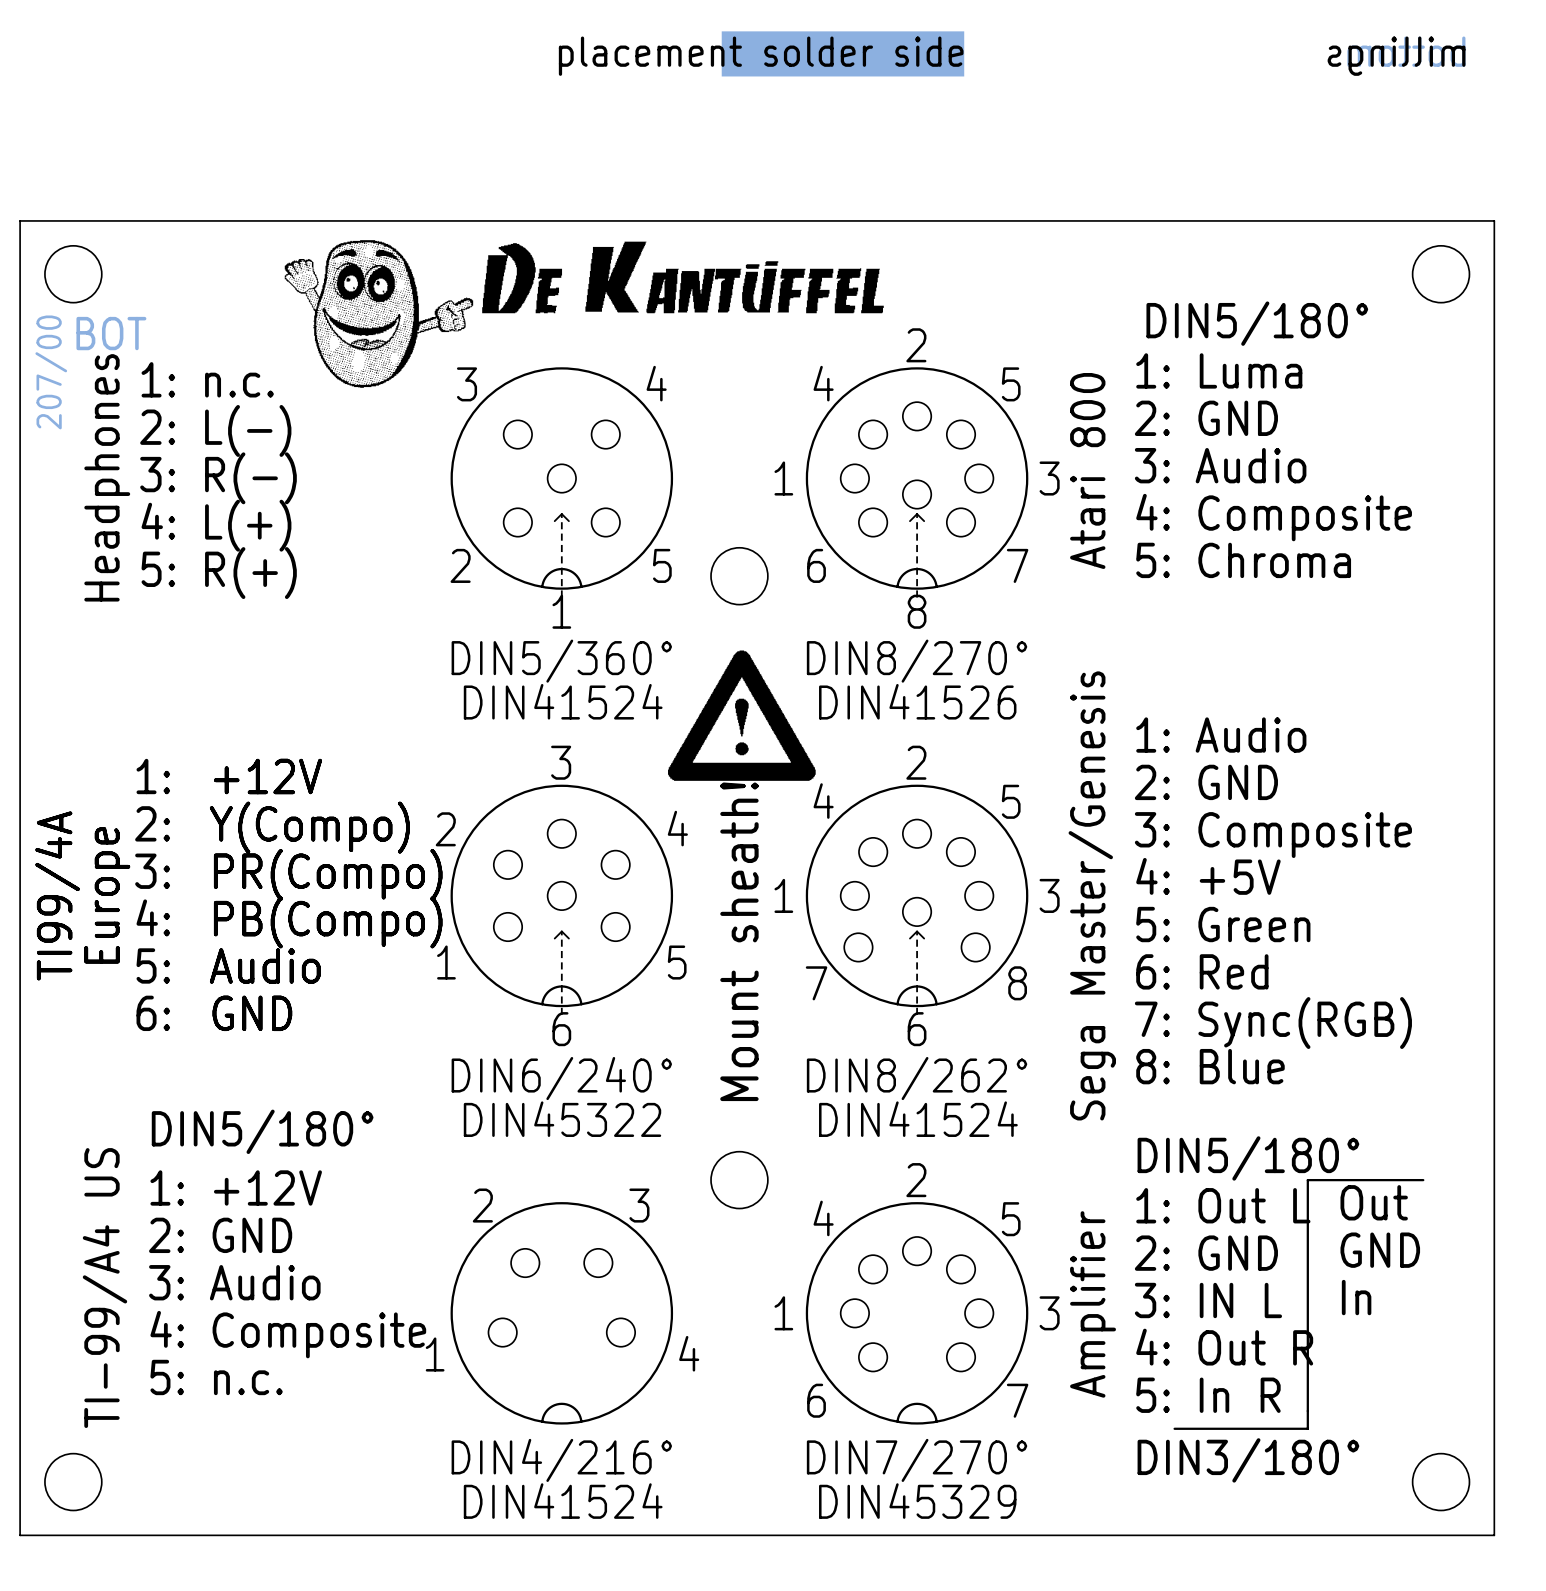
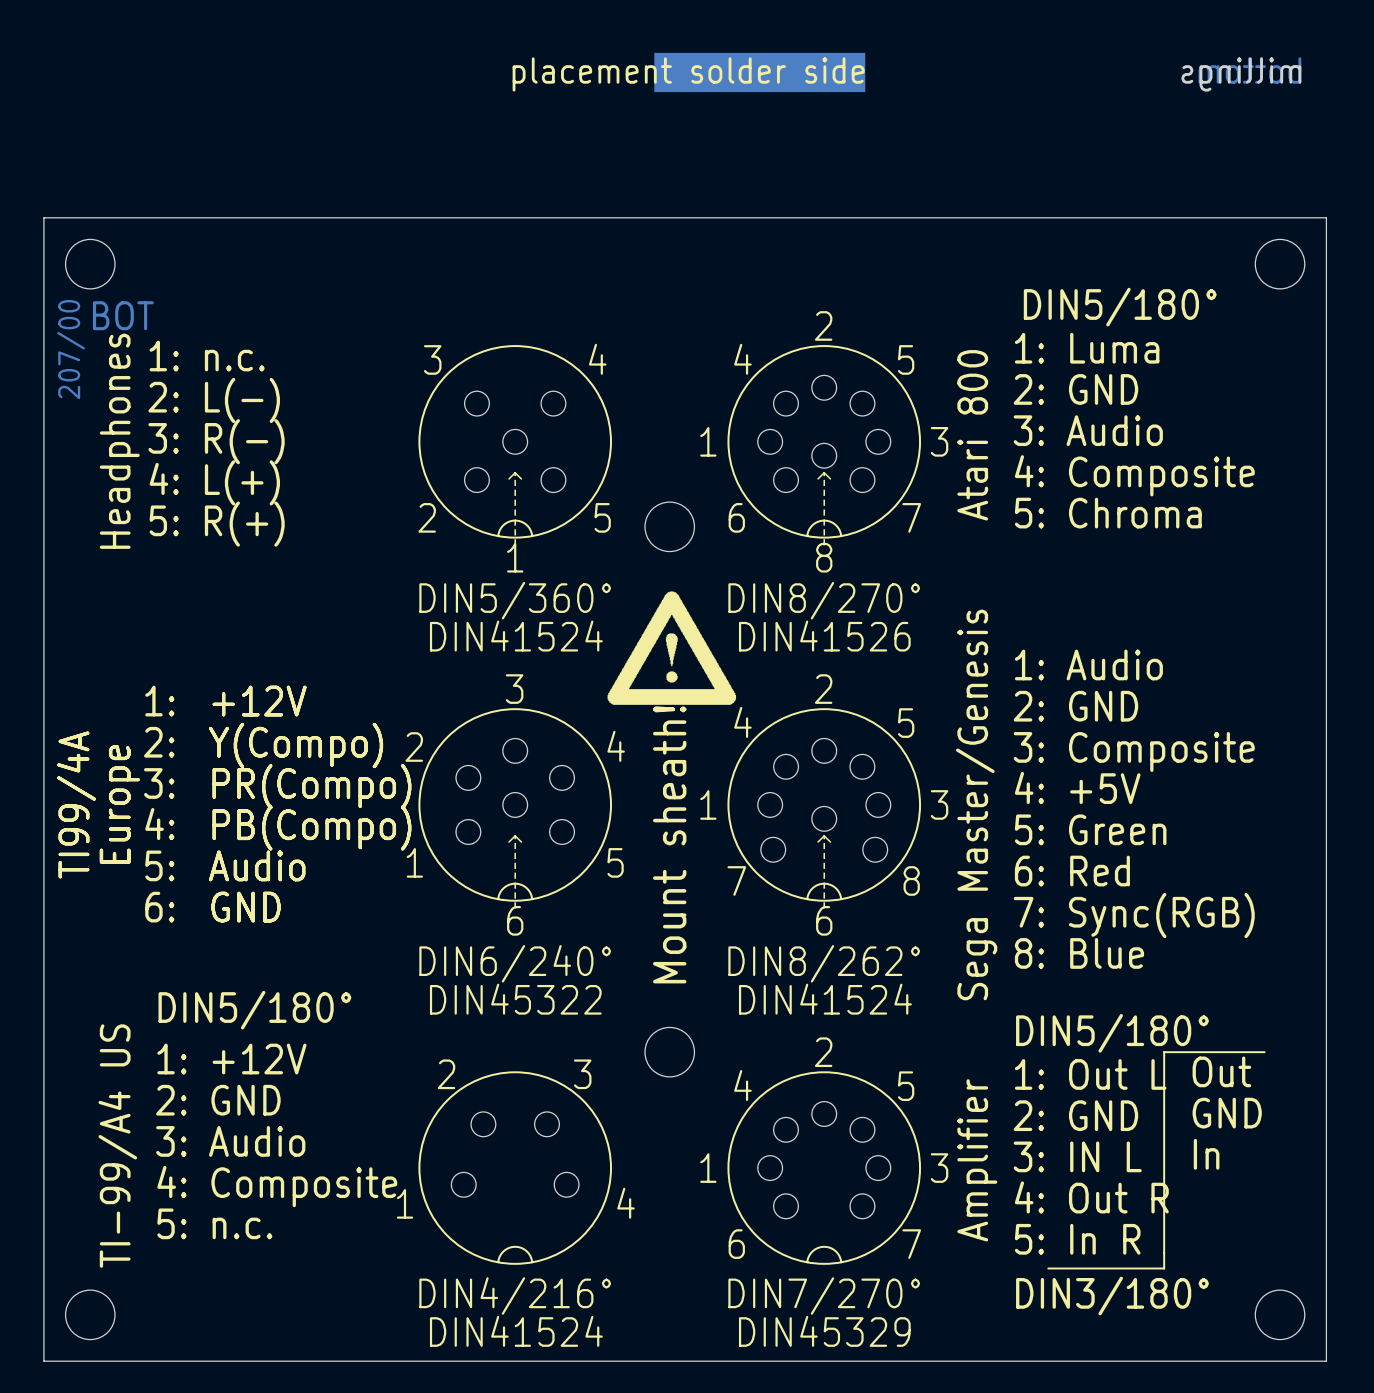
drawing: [284, 240, 884, 388] -> none

